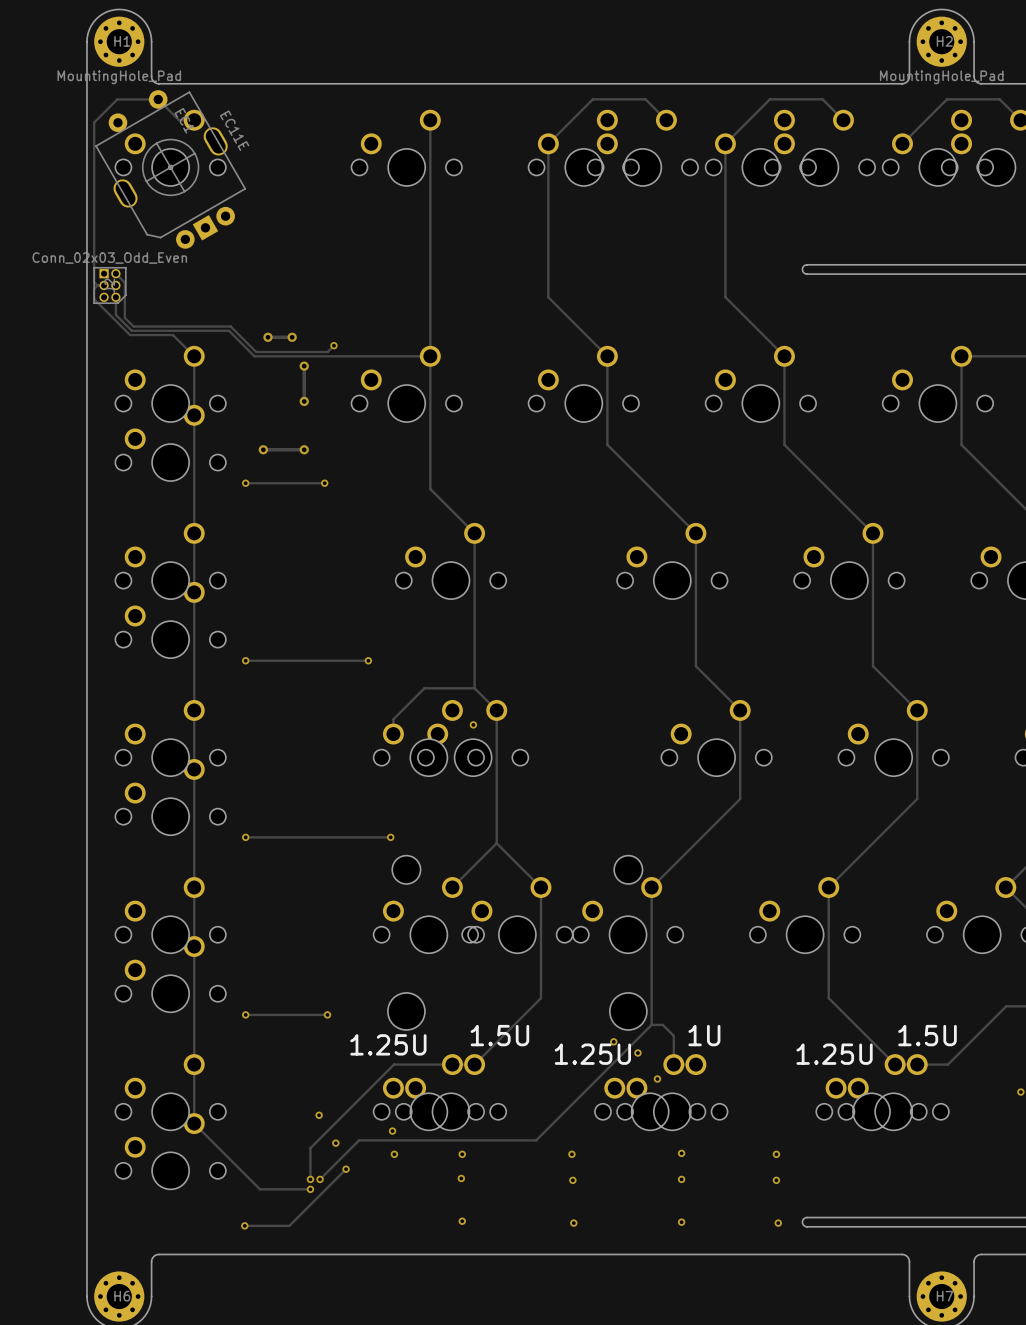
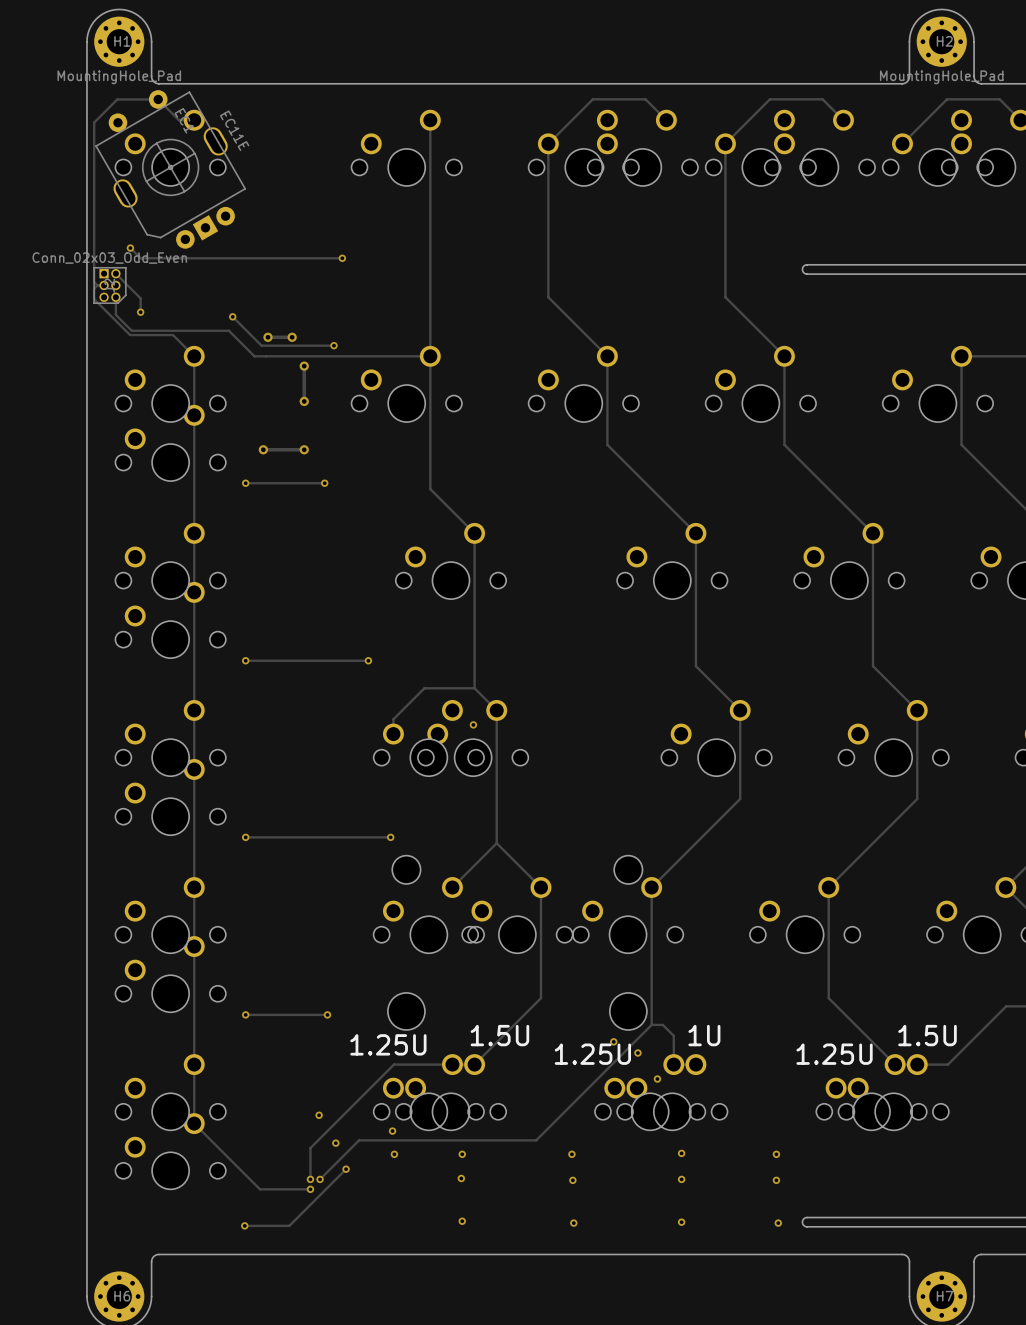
track: none -> (130, 248) (140, 258) (342, 258)
via: none -> (130, 248)
via: none -> (342, 258)
track: (124, 282) (124, 317) (133, 326) (230, 326) (256, 352) (327, 352) (333, 345) -> (232, 316) (261, 345) (333, 345)
track: none -> (124, 282) (140, 298) (140, 312)
via: none -> (140, 312)
via: none -> (232, 316)
via: (1020, 1092) -> none

